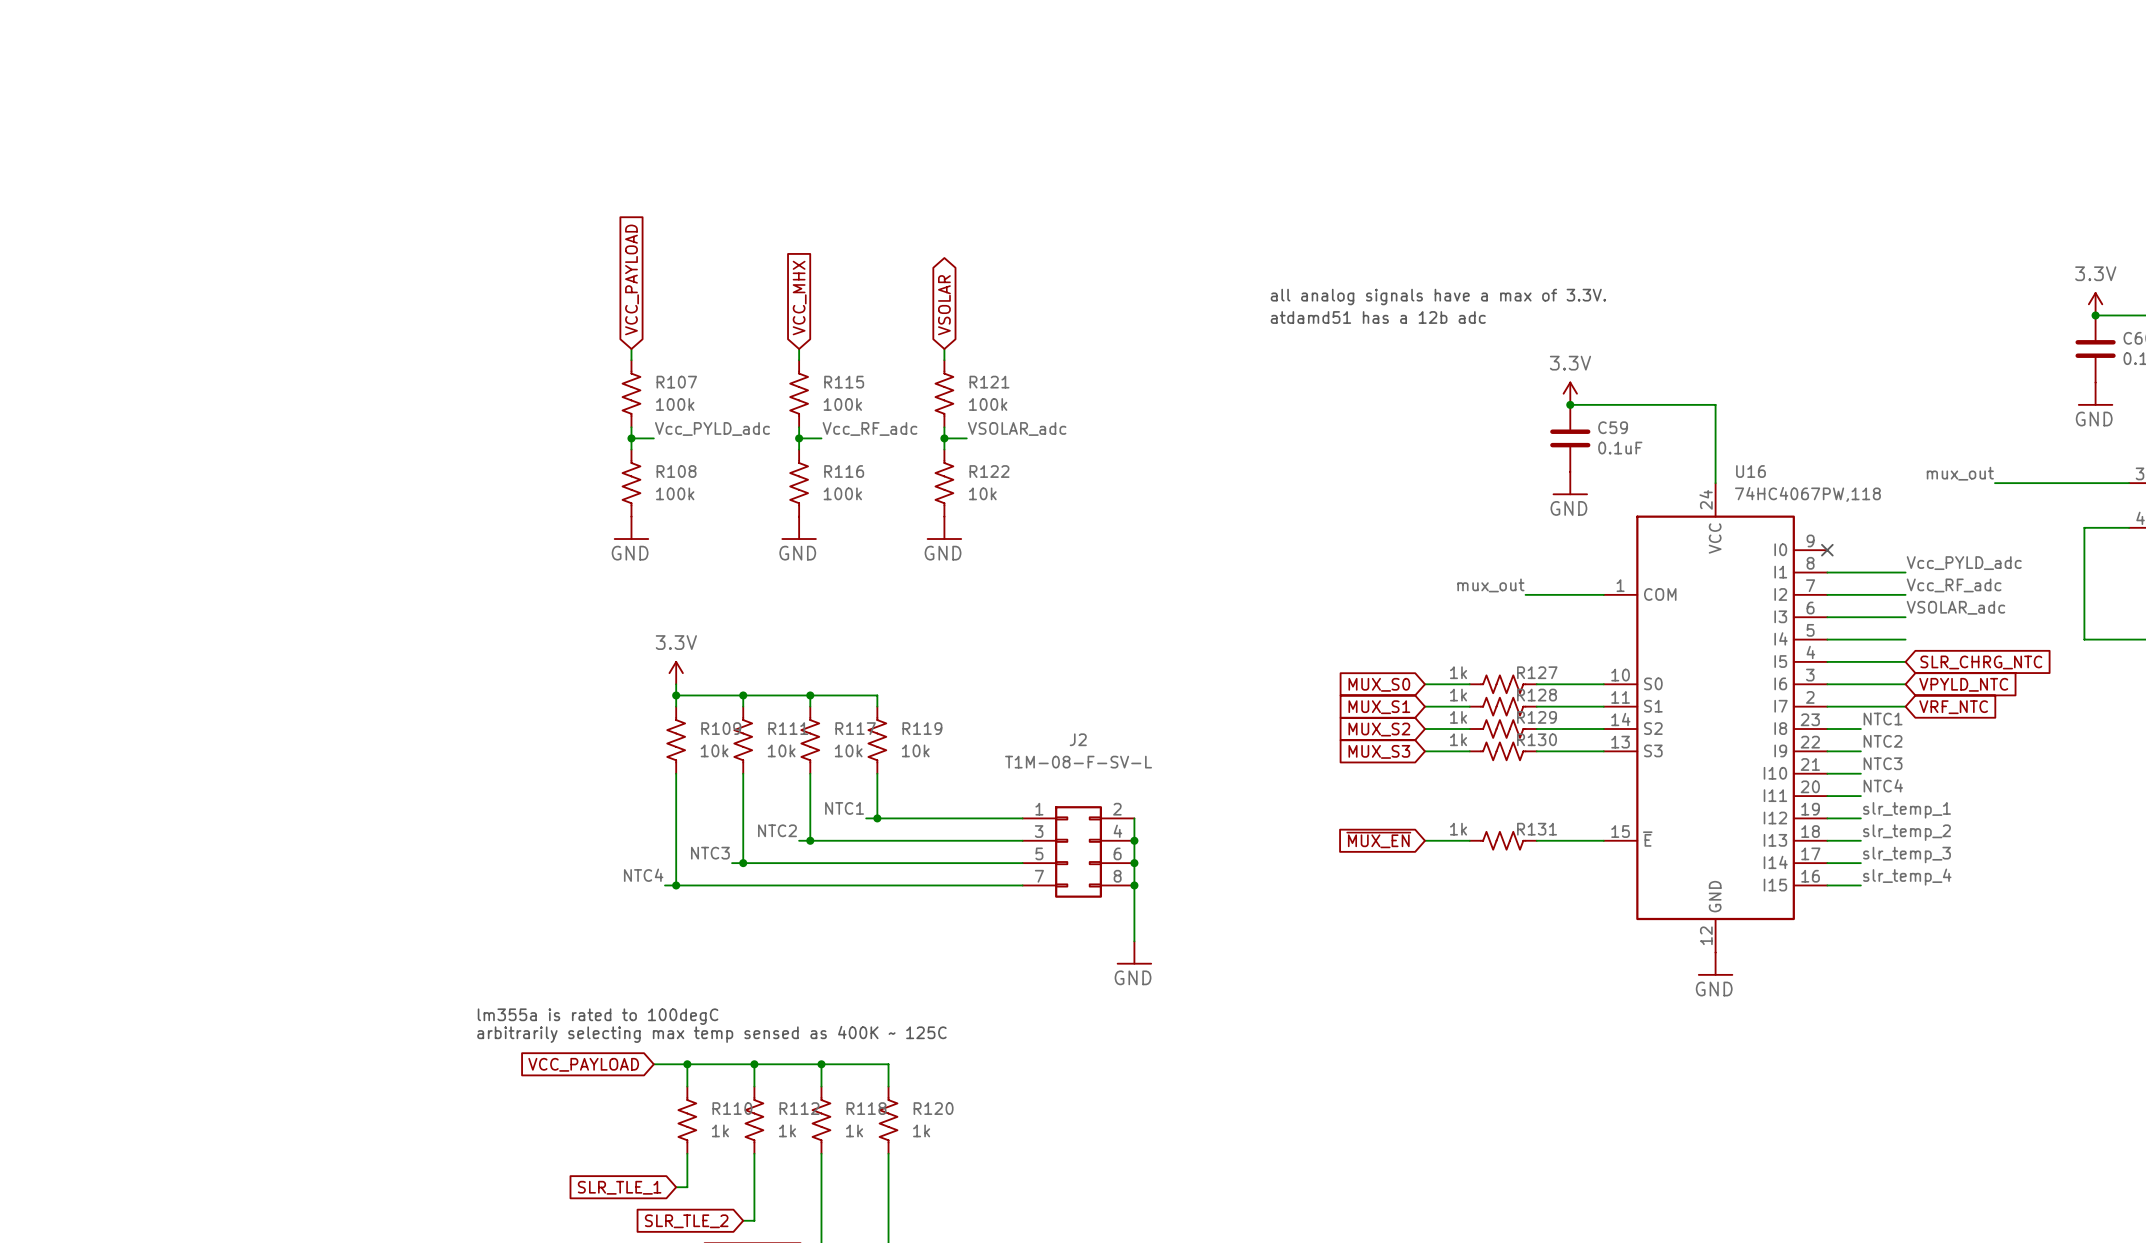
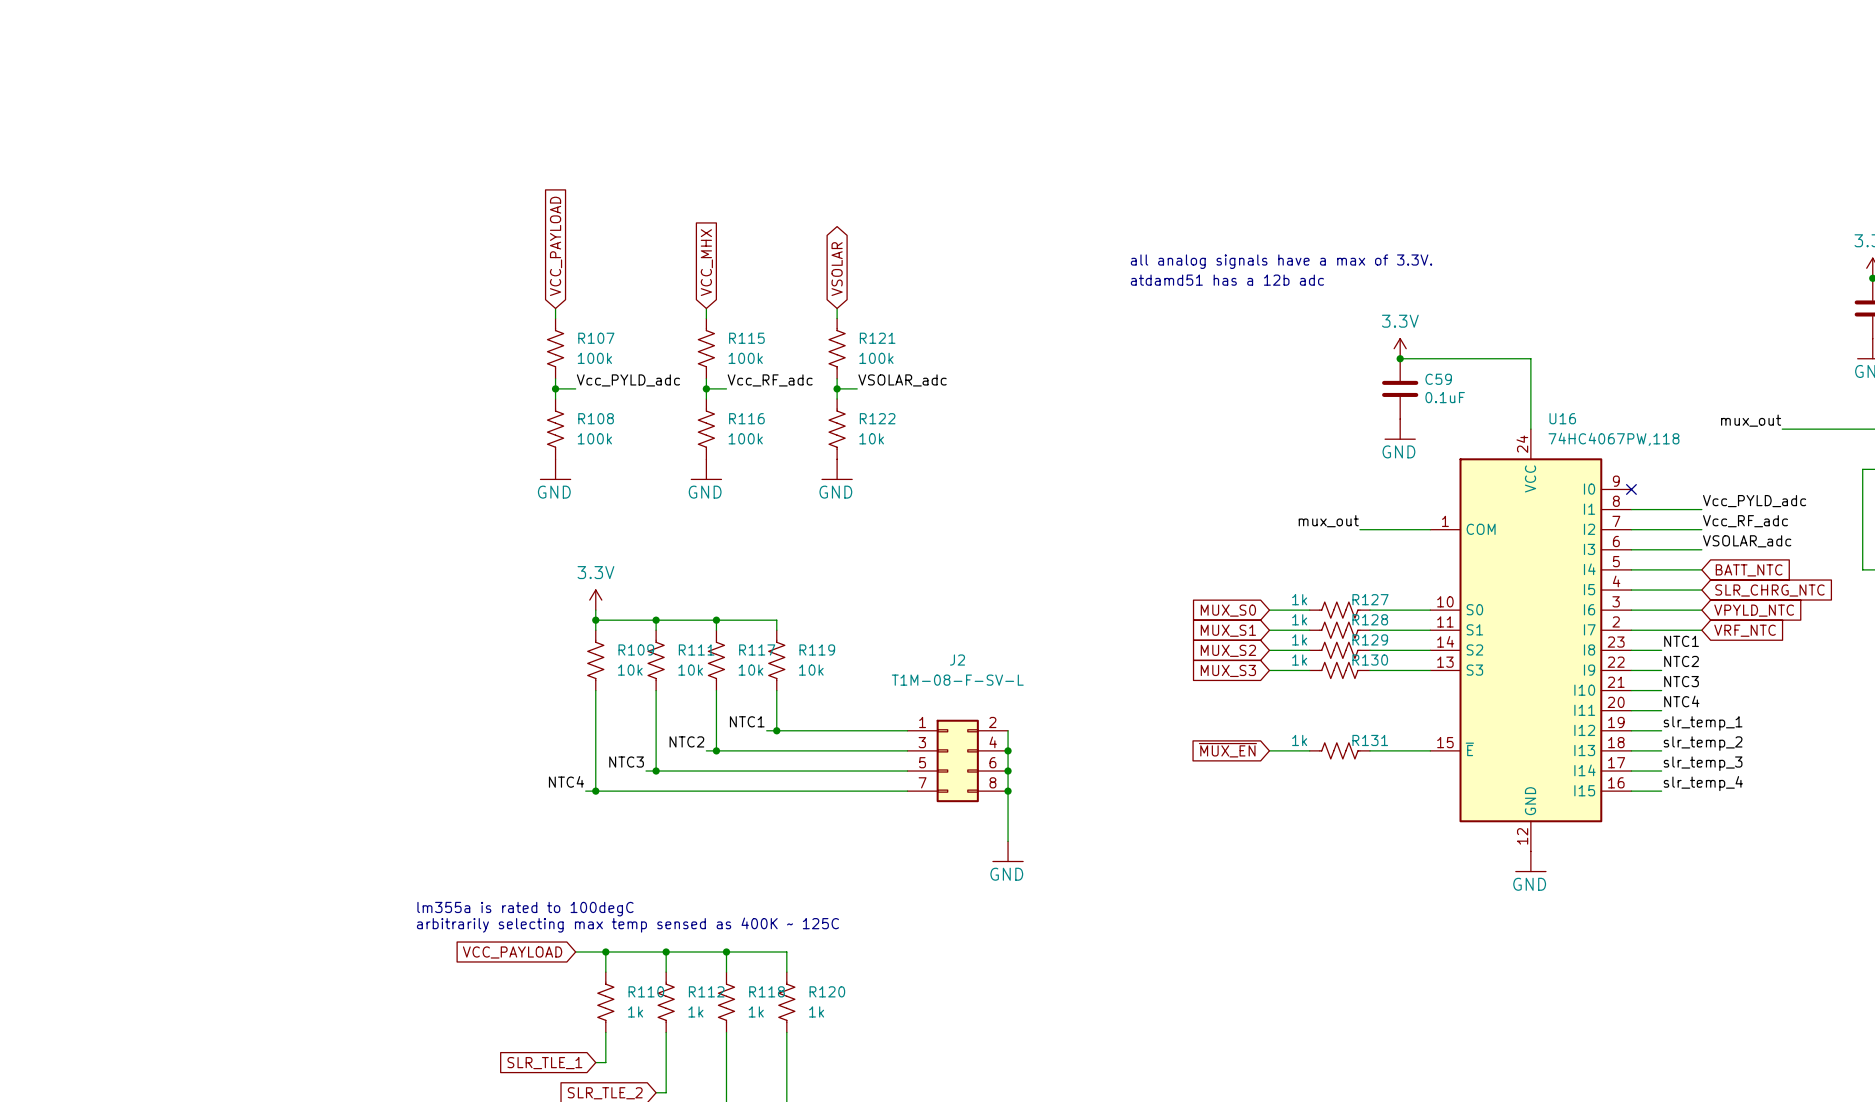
global label: none -> BATT_NTC (1749, 570)

